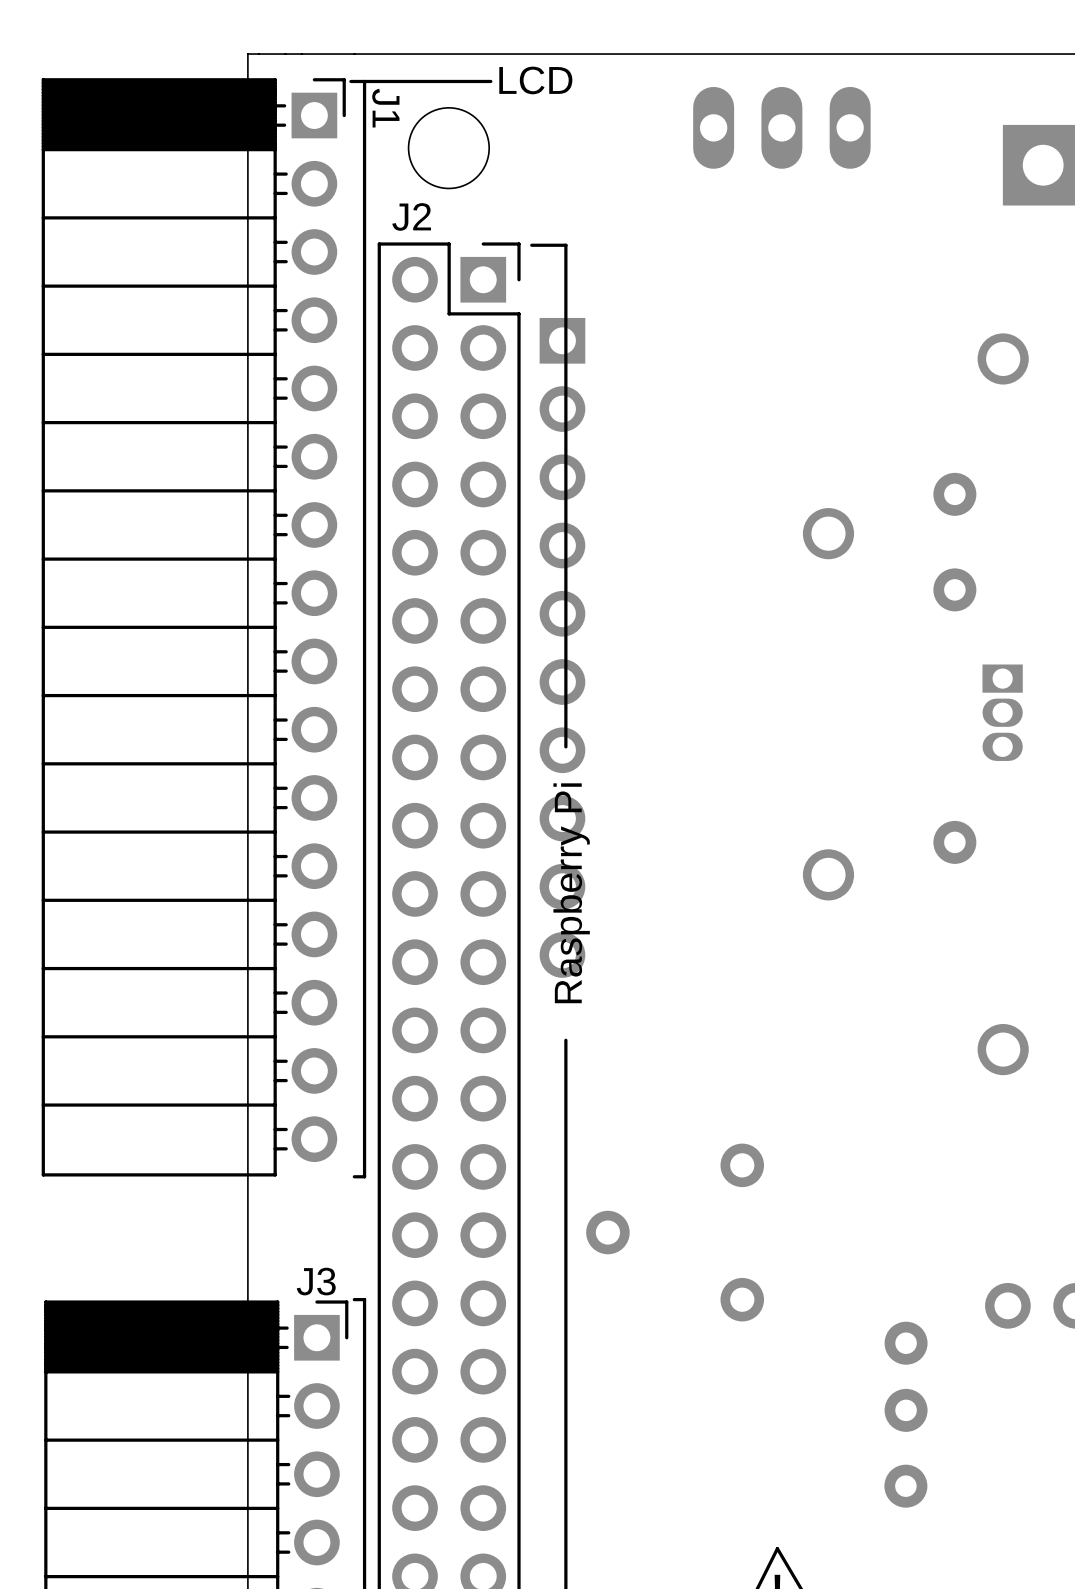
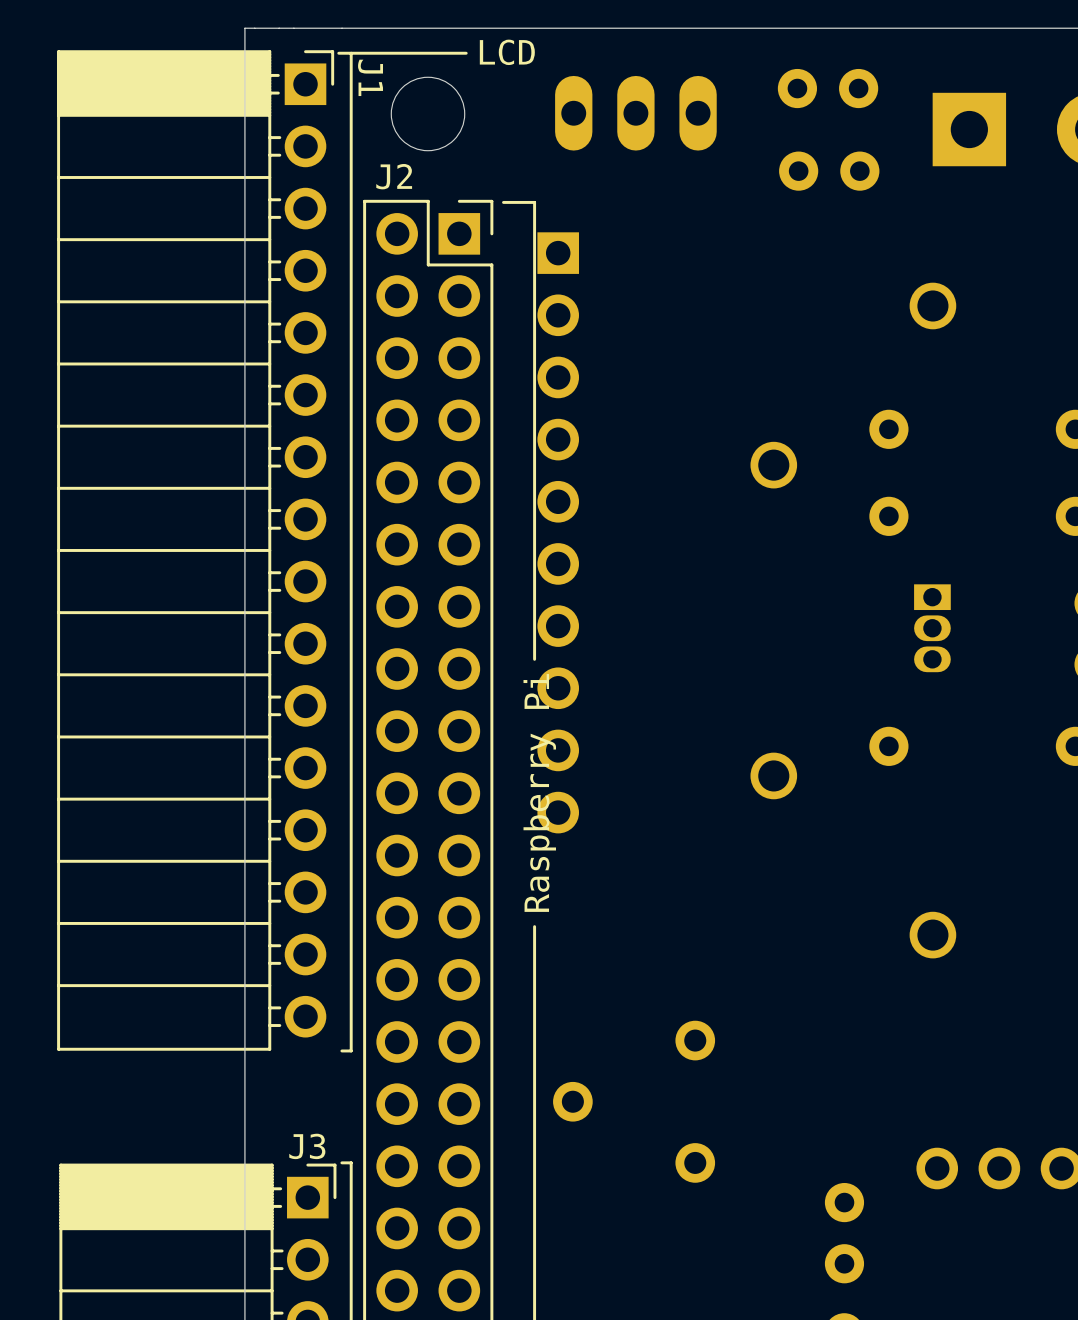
part: none -> (828, 88)
part position: (781, 127) -> (635, 113)
part: none -> (829, 171)
part position: (562, 647) -> (558, 532)

